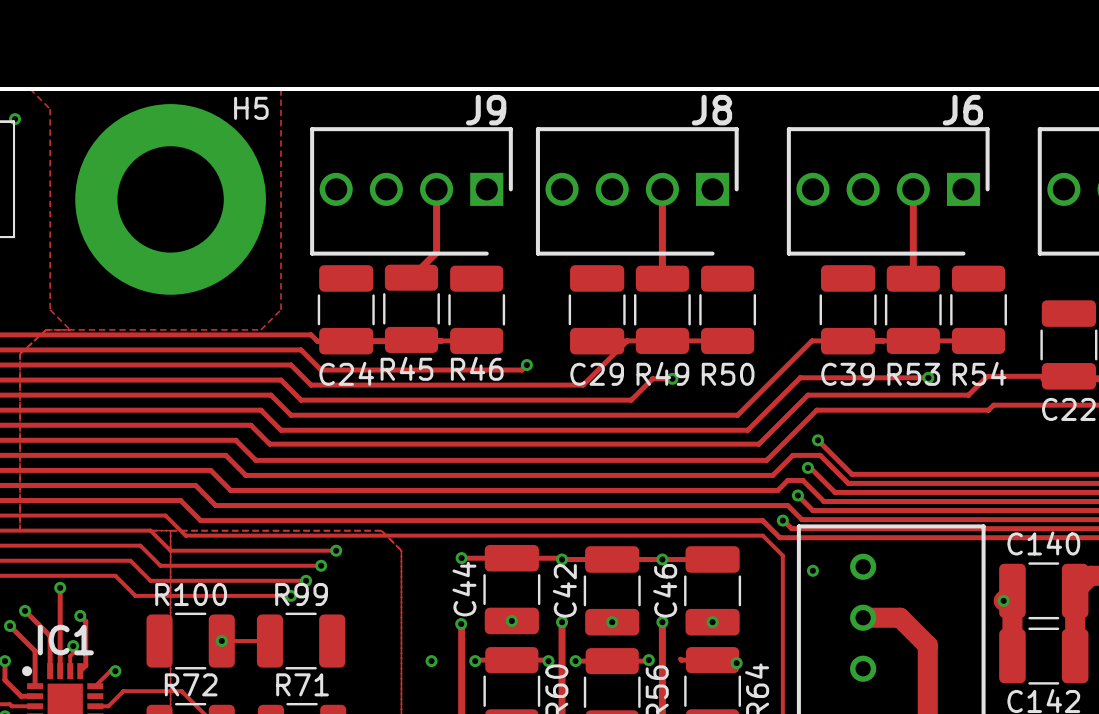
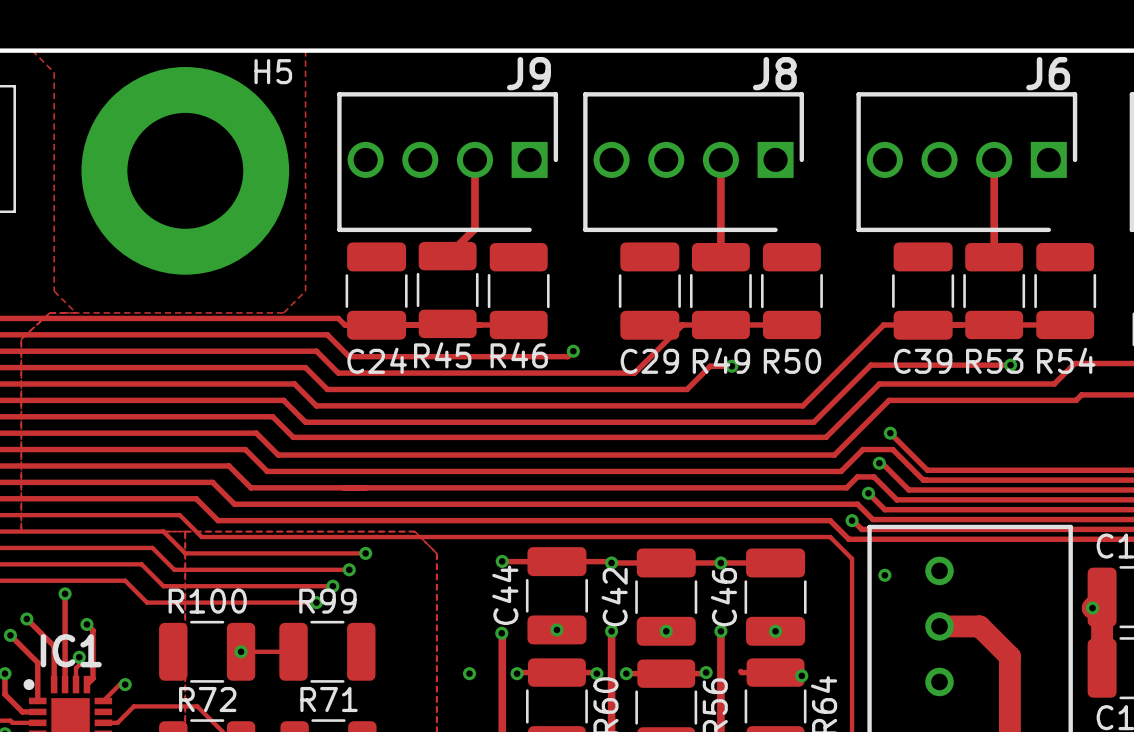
via: (15, 119) -> none

